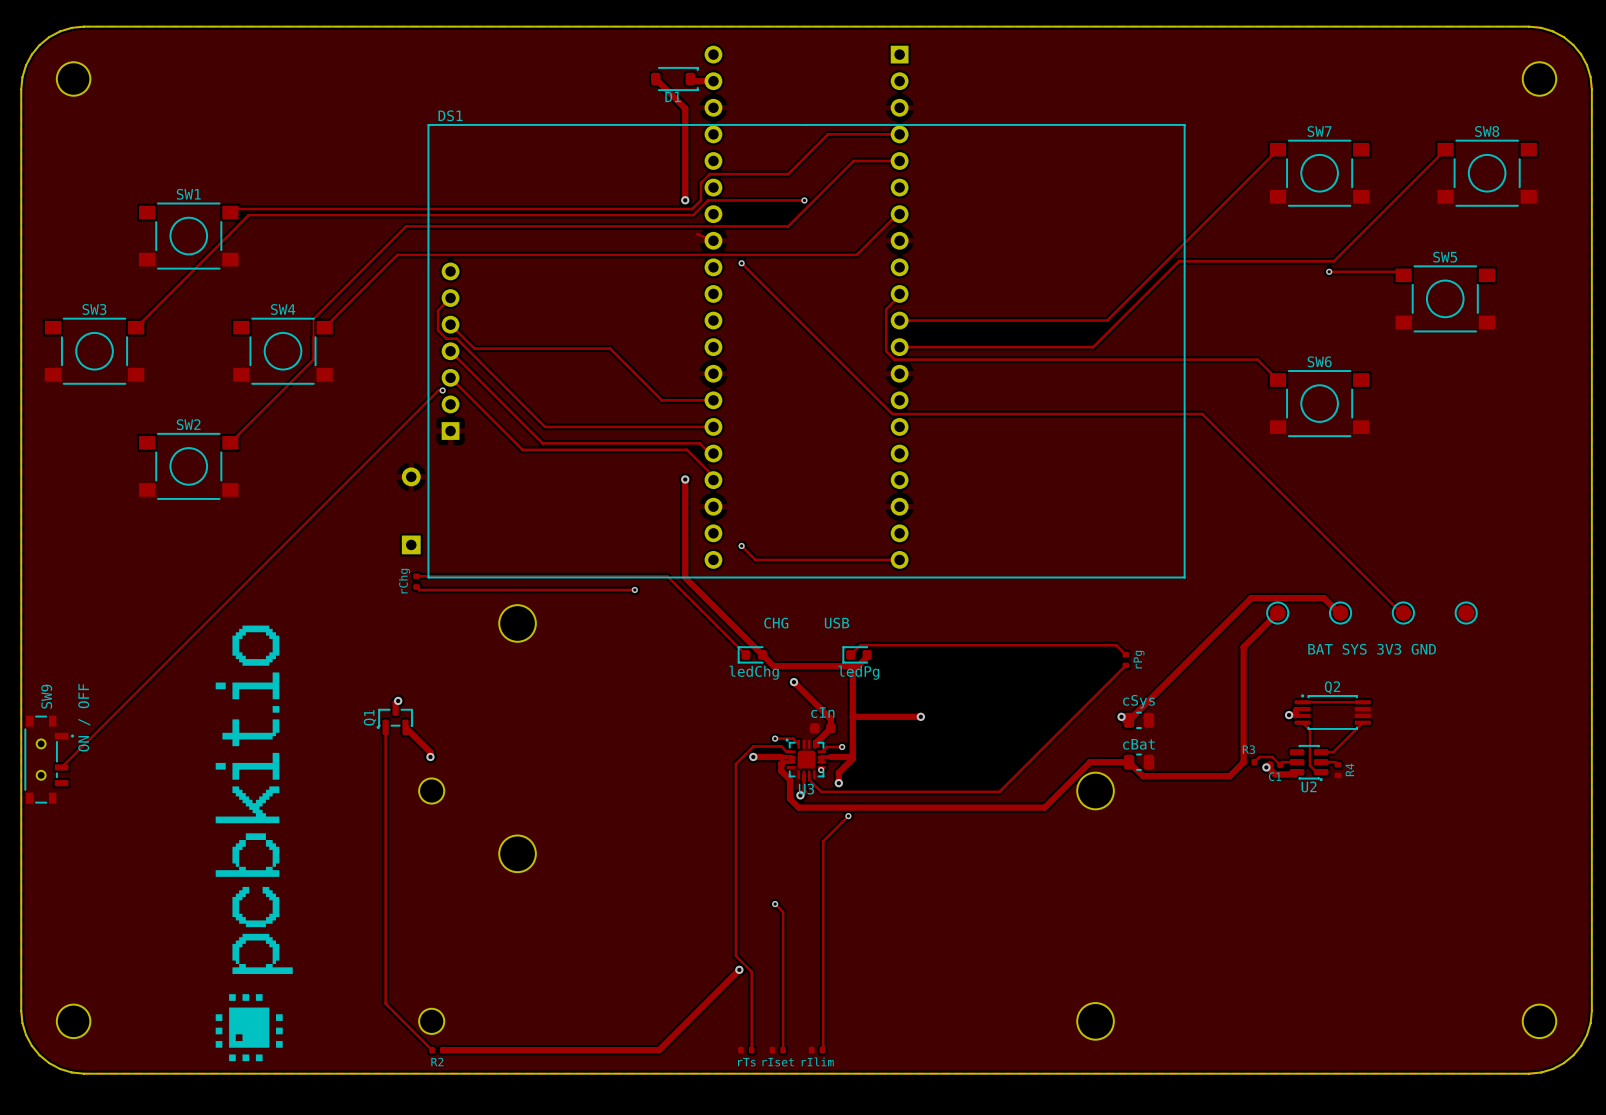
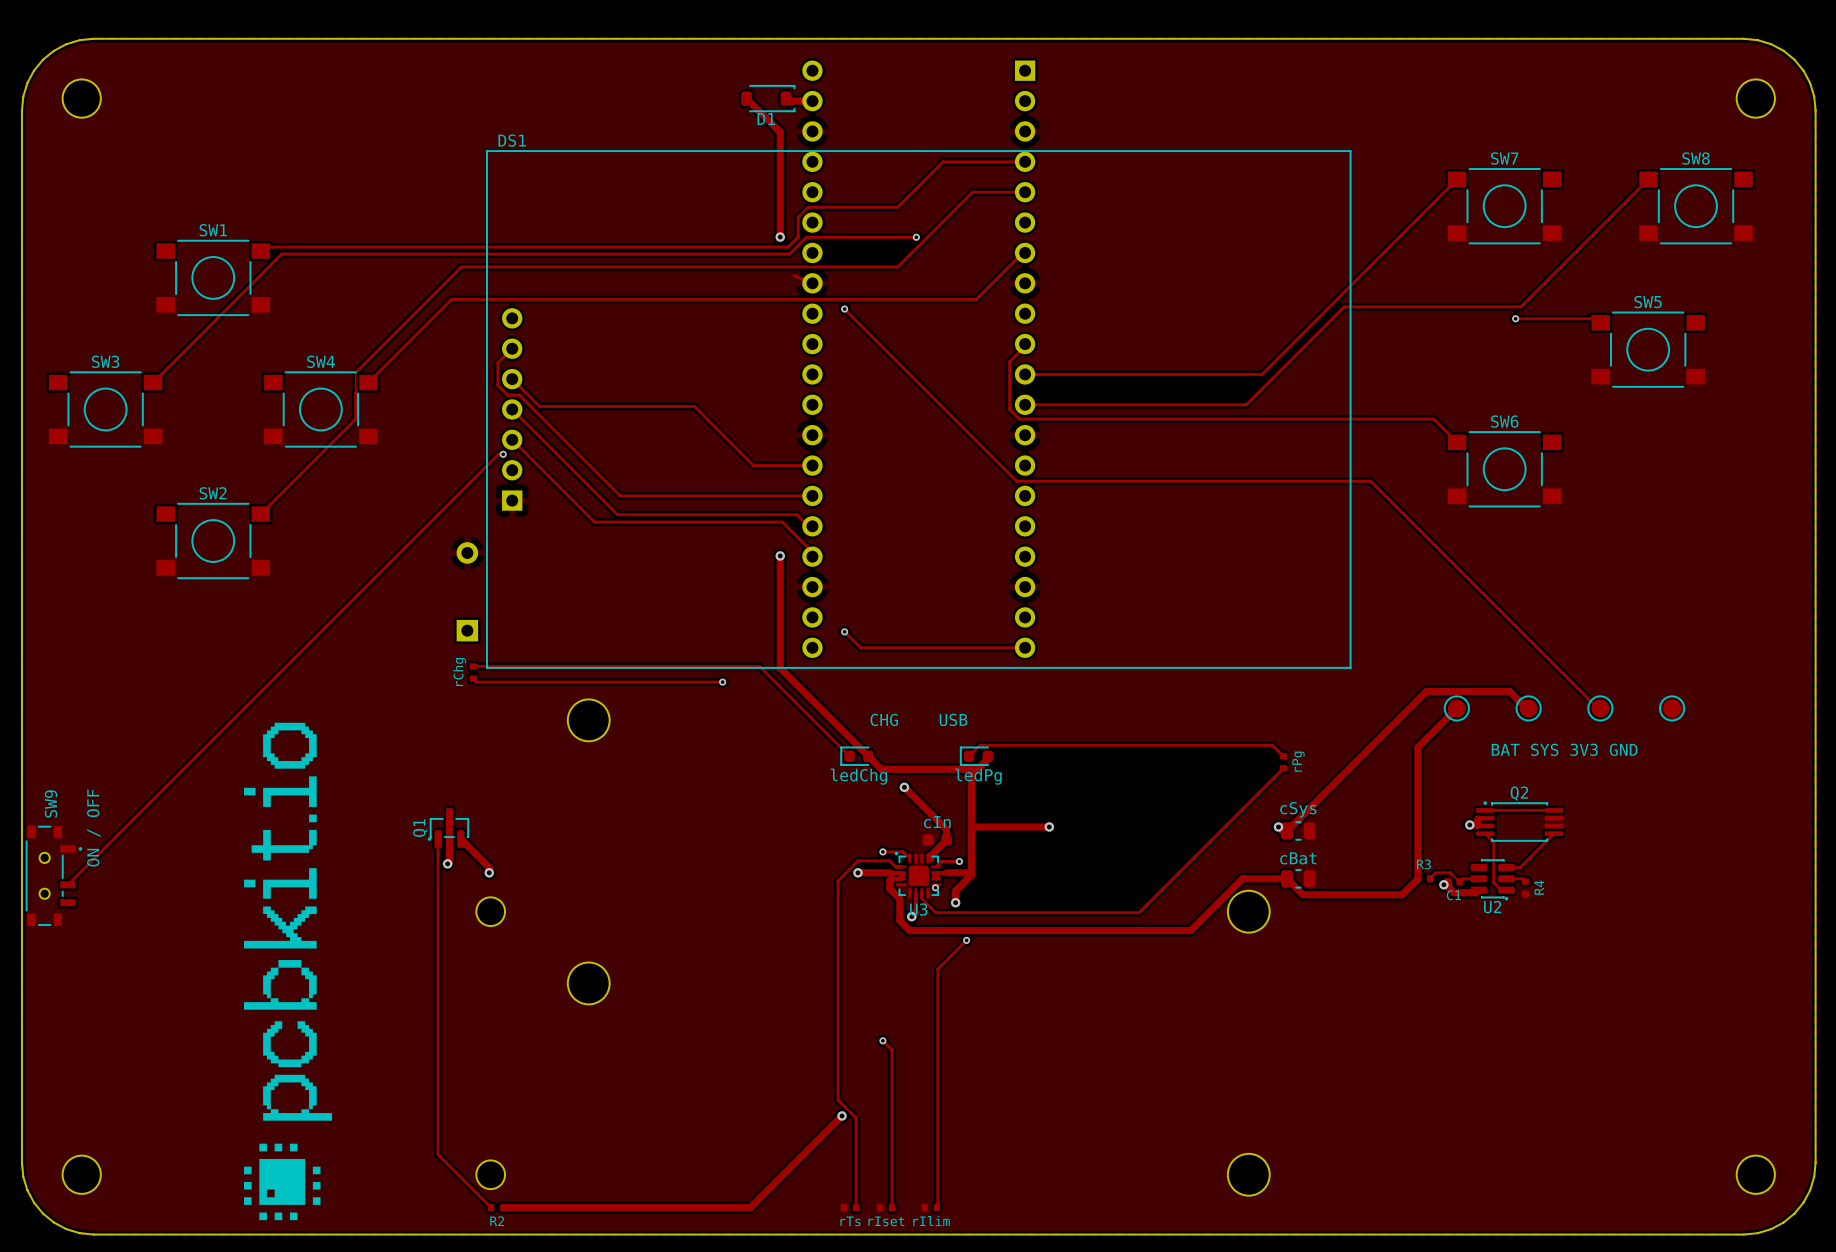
via position: (398, 700) -> (447, 863)
track: none -> (449, 816) (449, 862) (447, 863)

